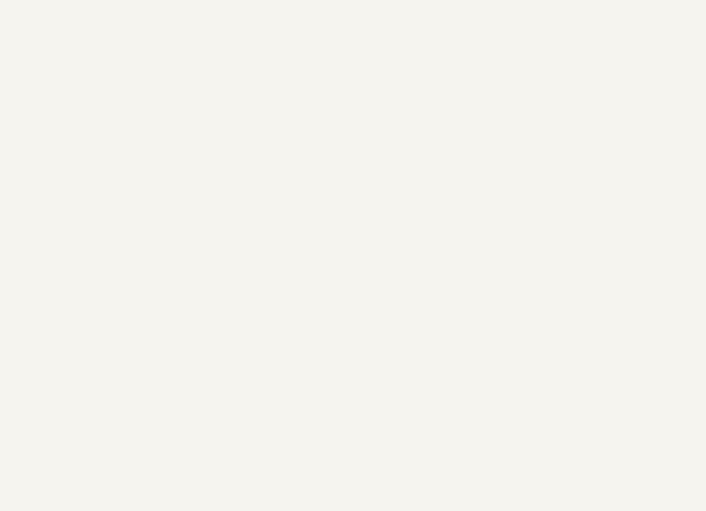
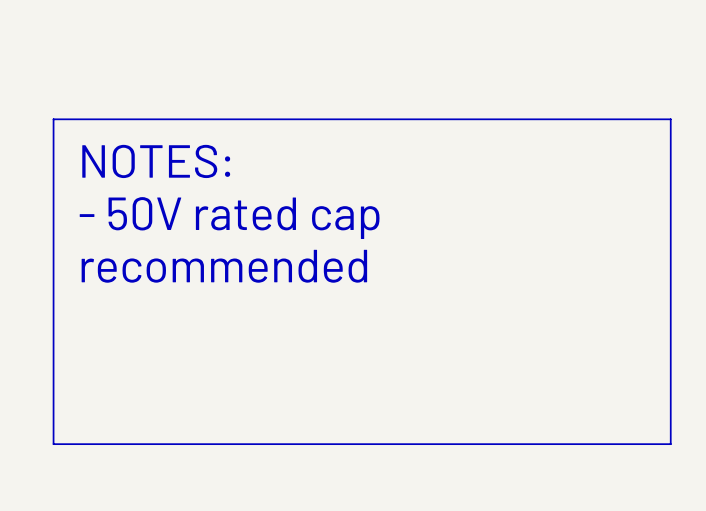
line: none -> (53, 119) (670, 119) (670, 444) (53, 444) (53, 119)
text: none -> NOTES: (156, 161)
text: none -> - 50V rated cap (229, 218)
text: none -> recommended (224, 266)

